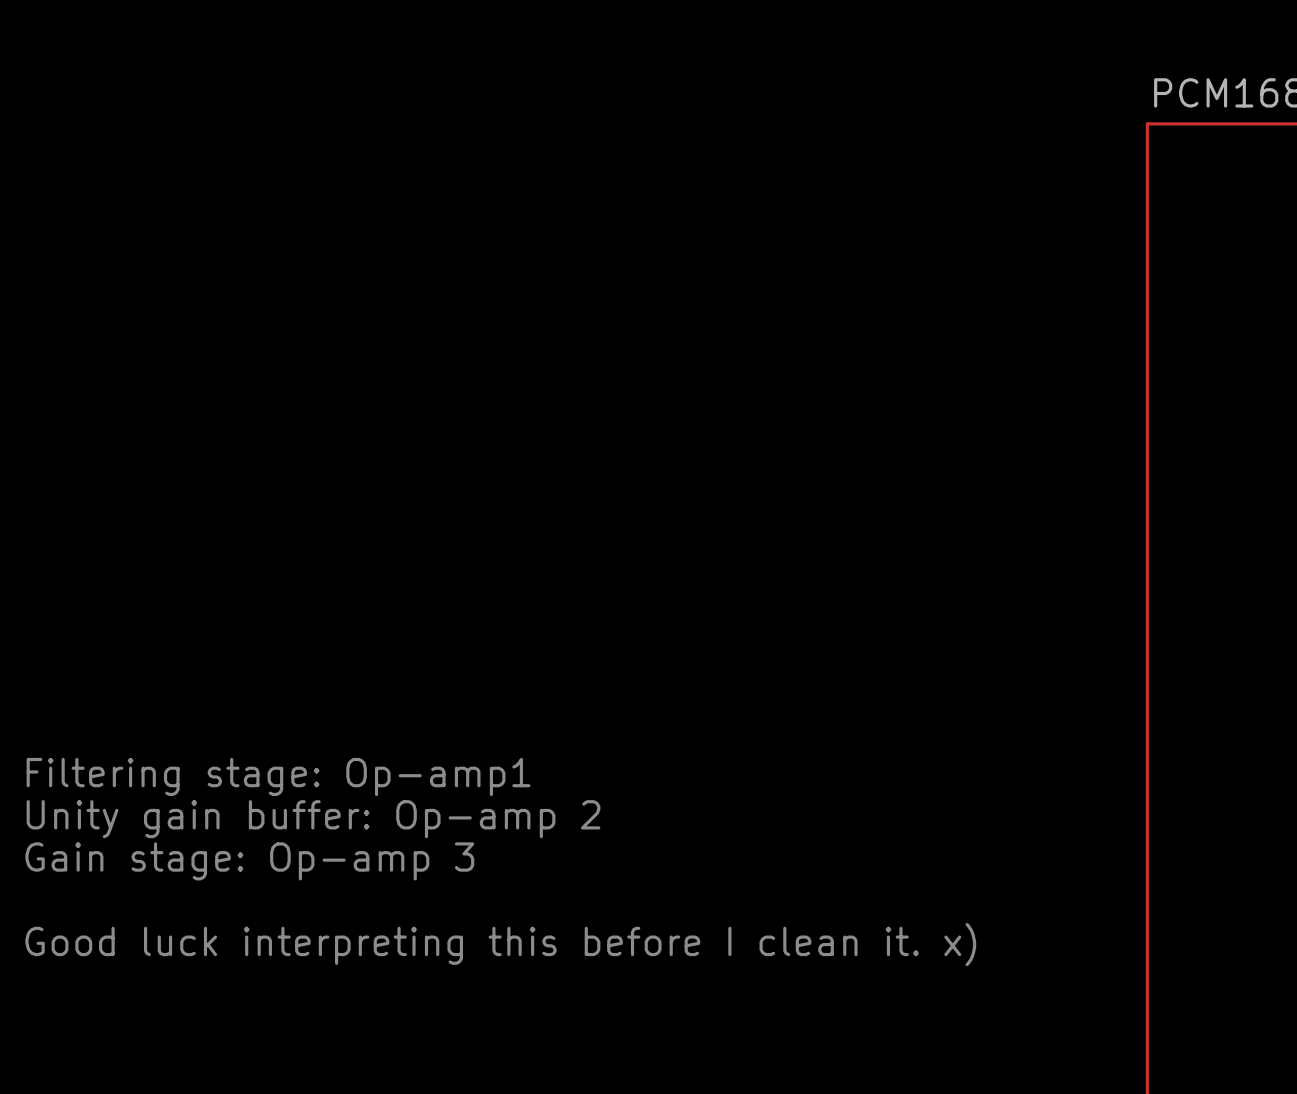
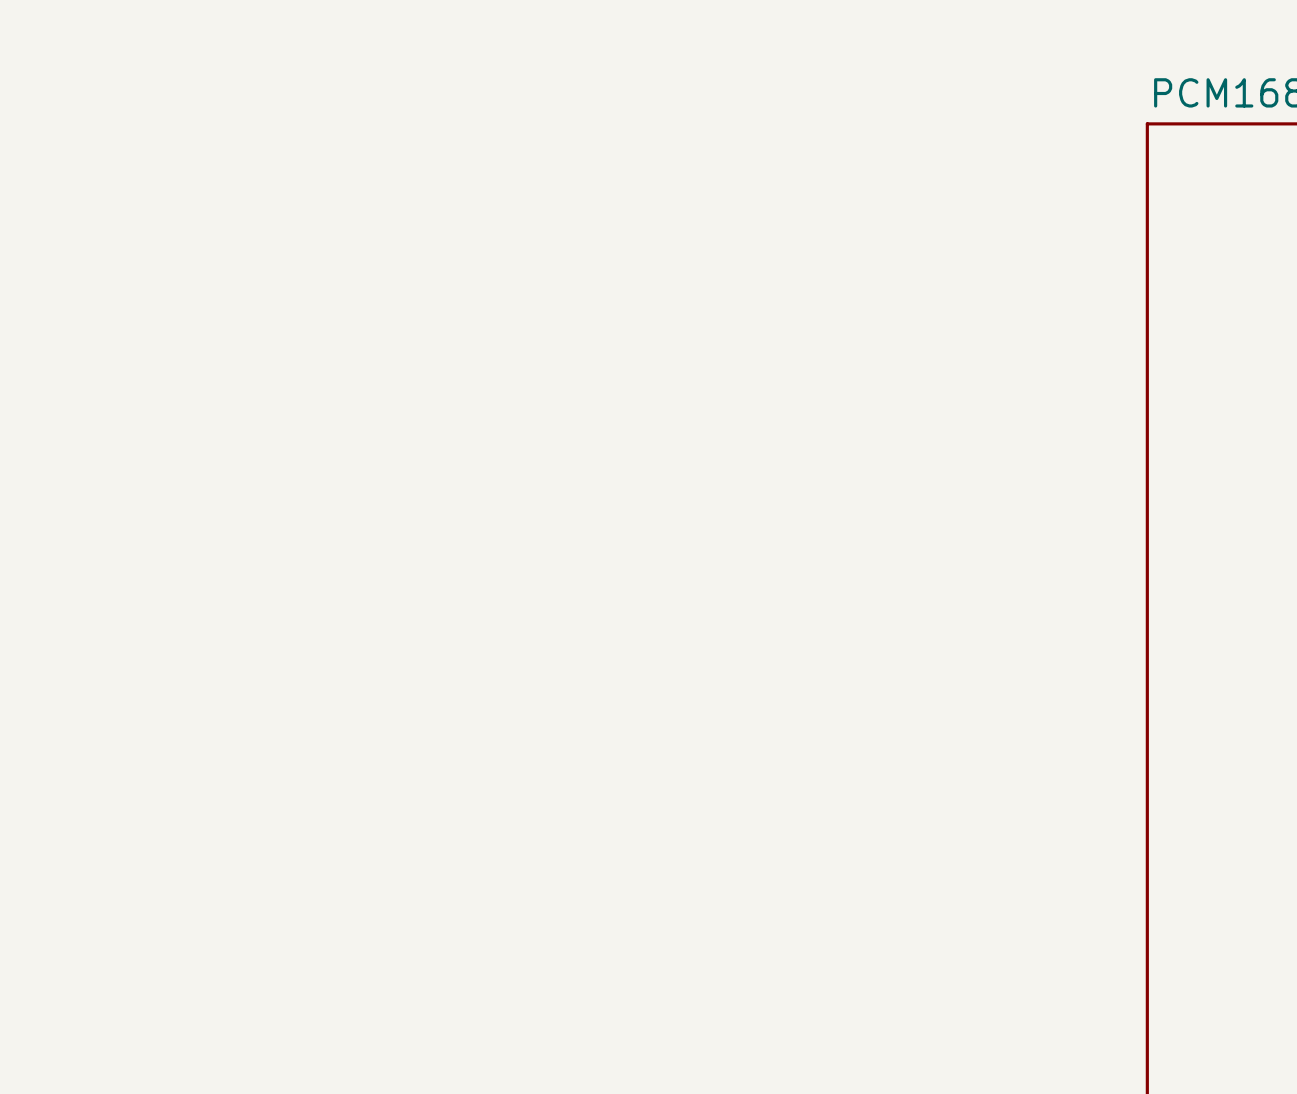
text: Filtering stage: Op-amp1 (278, 776) -> none
text: Unity gain buffer: Op-amp 2 (313, 819) -> none
text: Gain stage: Op-amp 3 (249, 861) -> none
text: Good luck interpreting this before I clean it. x) (500, 944) -> none

